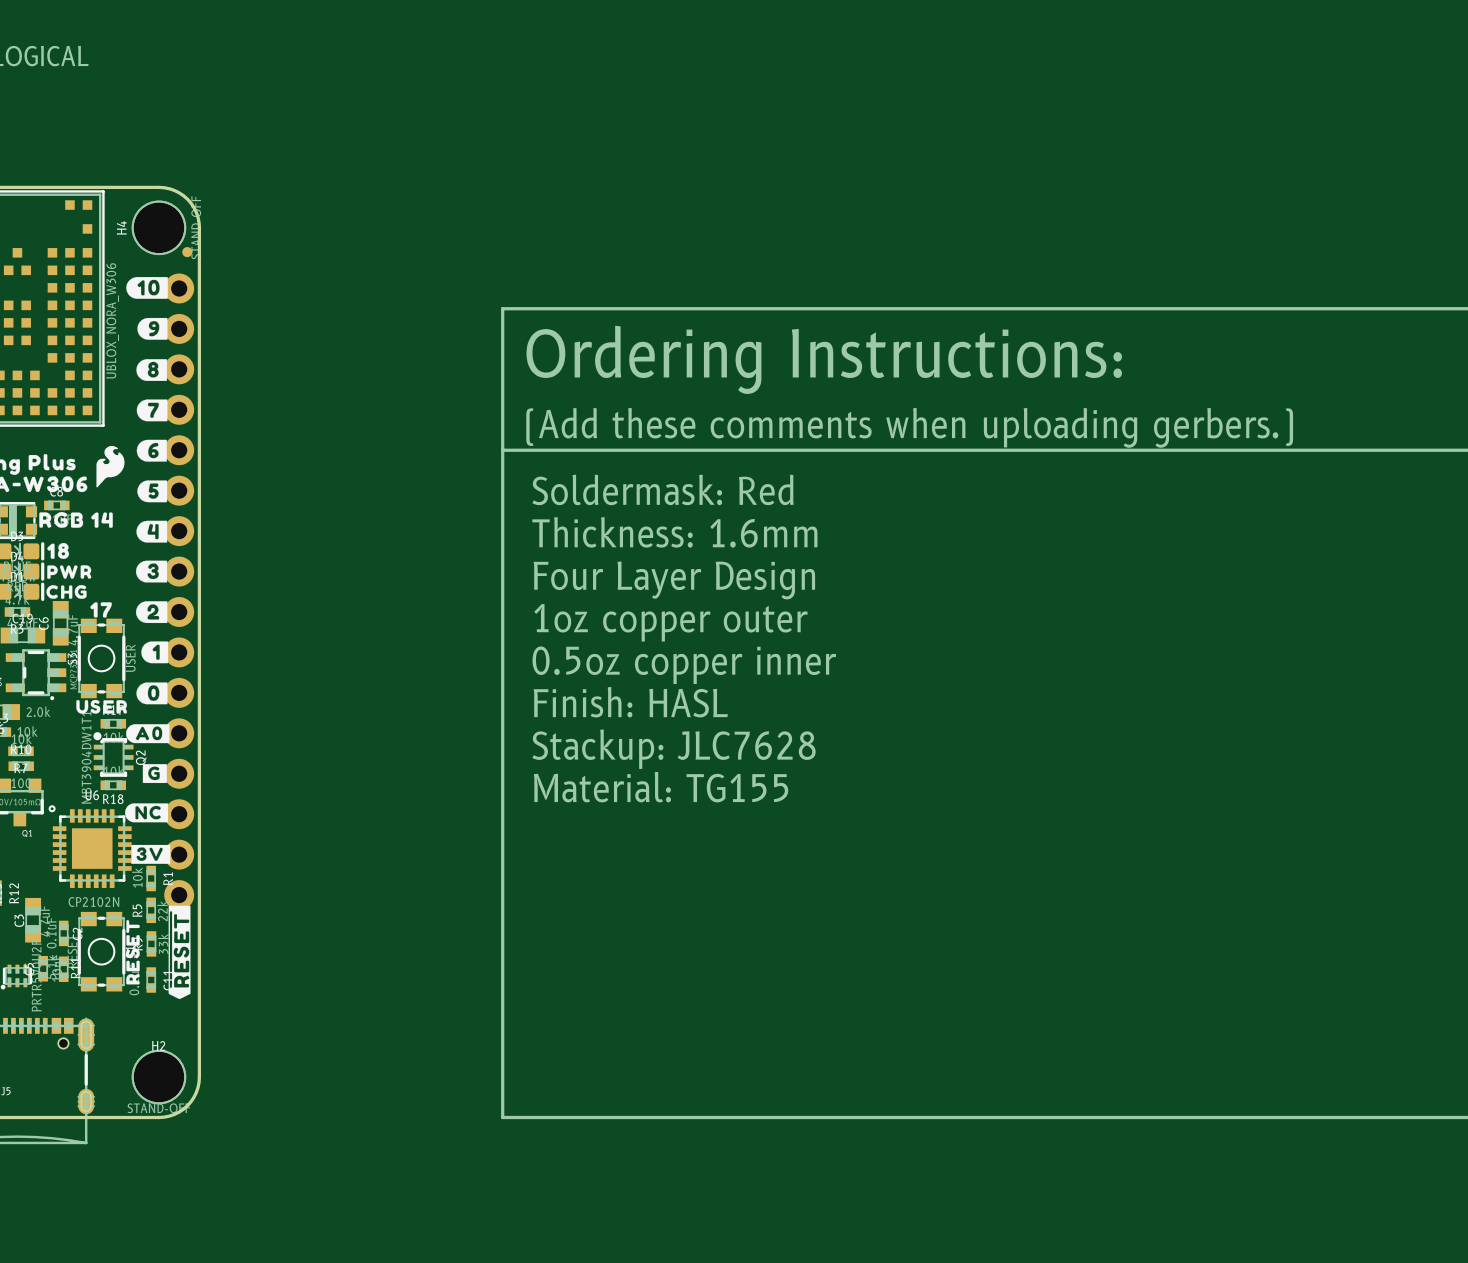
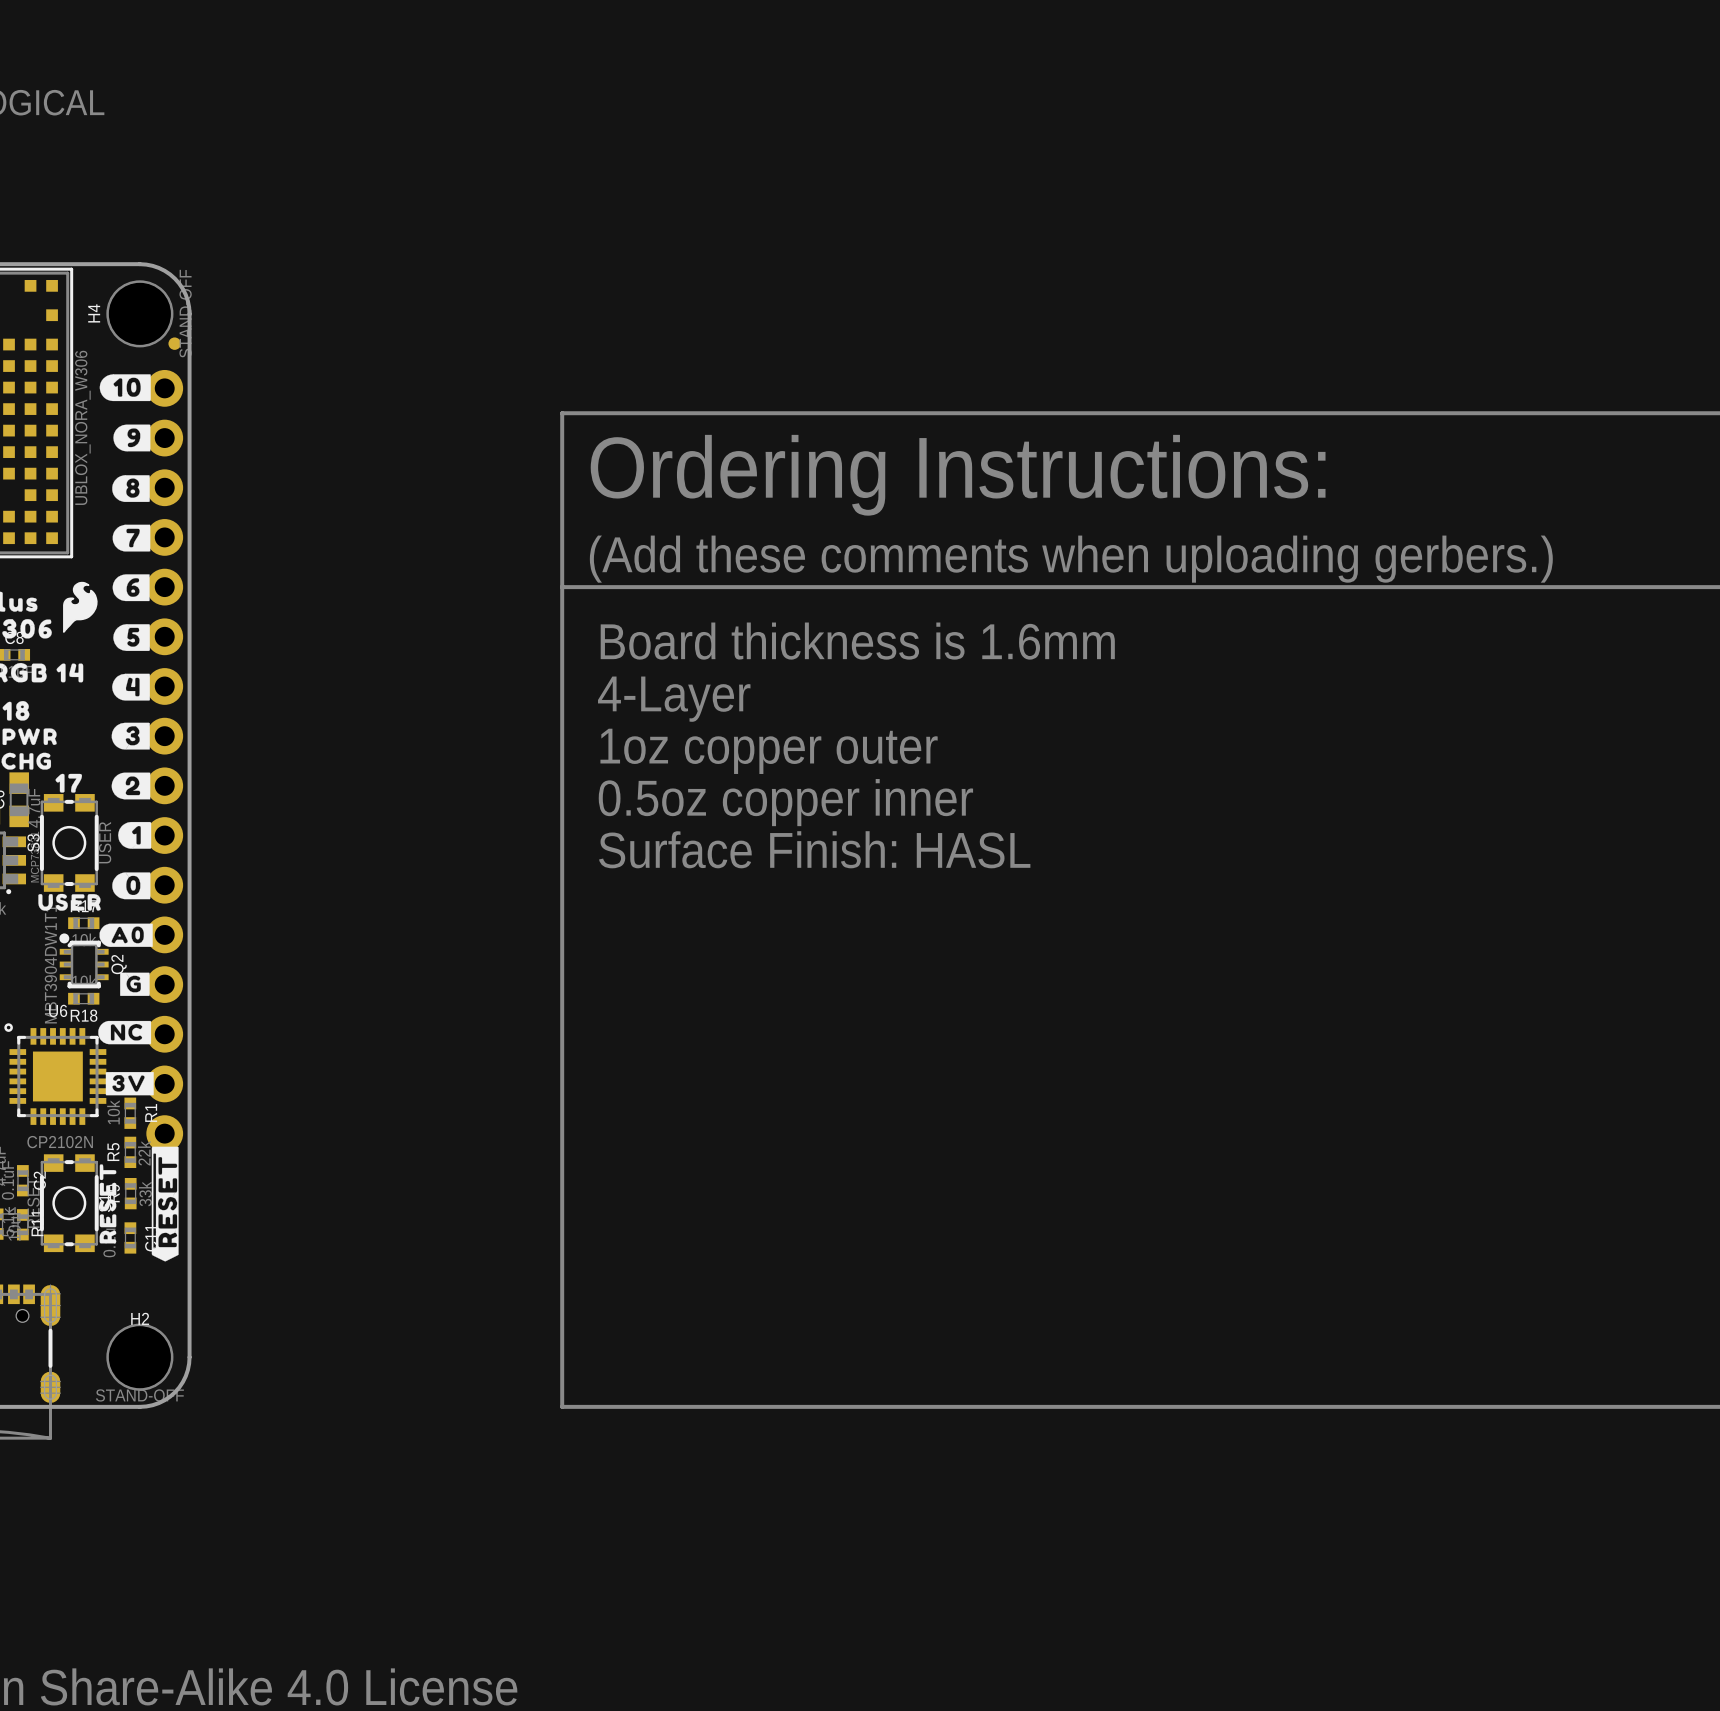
text: Soldermask: Red (663, 489) -> none
text: Thickness: 1.6mm (674, 532) -> Board thickness is 1.6mm (857, 641)
text: Four Layer Design (674, 580) -> 4-Layer (674, 699)
text position: 1oz copper outer (670, 622) -> 1oz copper outer (769, 751)
text position: 0.5oz copper inner (684, 665) -> 0.5oz copper inner (785, 802)
text: Finish: HASL (630, 702) -> Surface Finish: HASL (814, 849)
text: Stackup: JLC7628 (674, 749) -> none
text: Material: TG155 (661, 787) -> none

